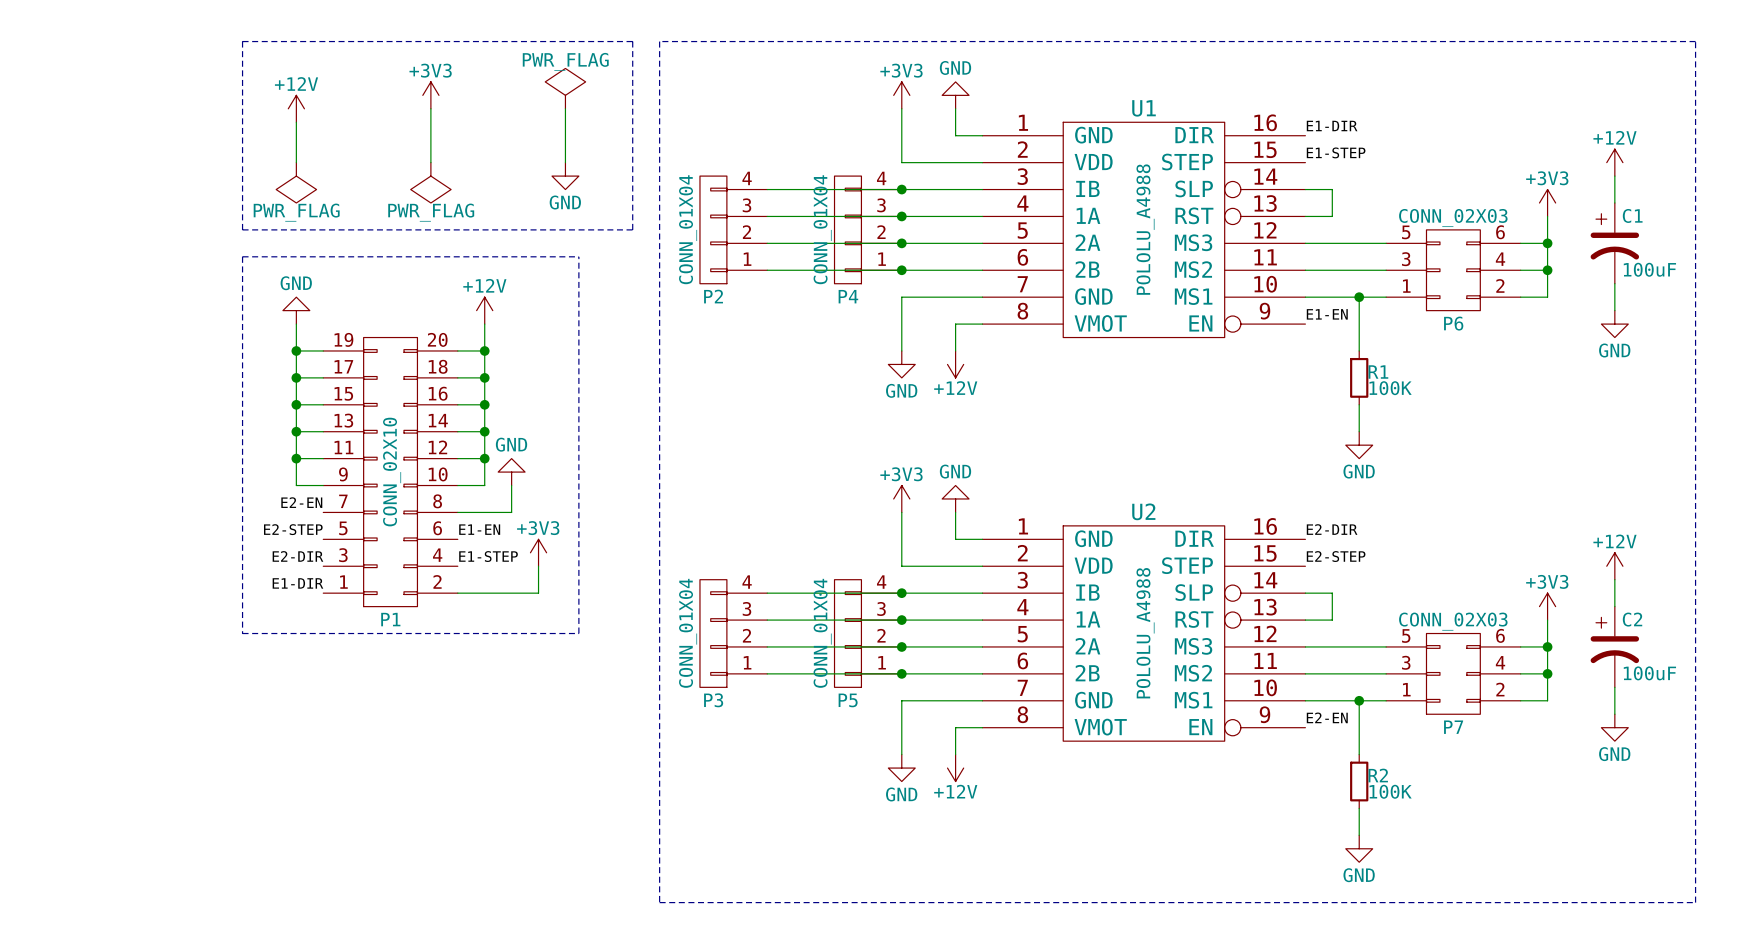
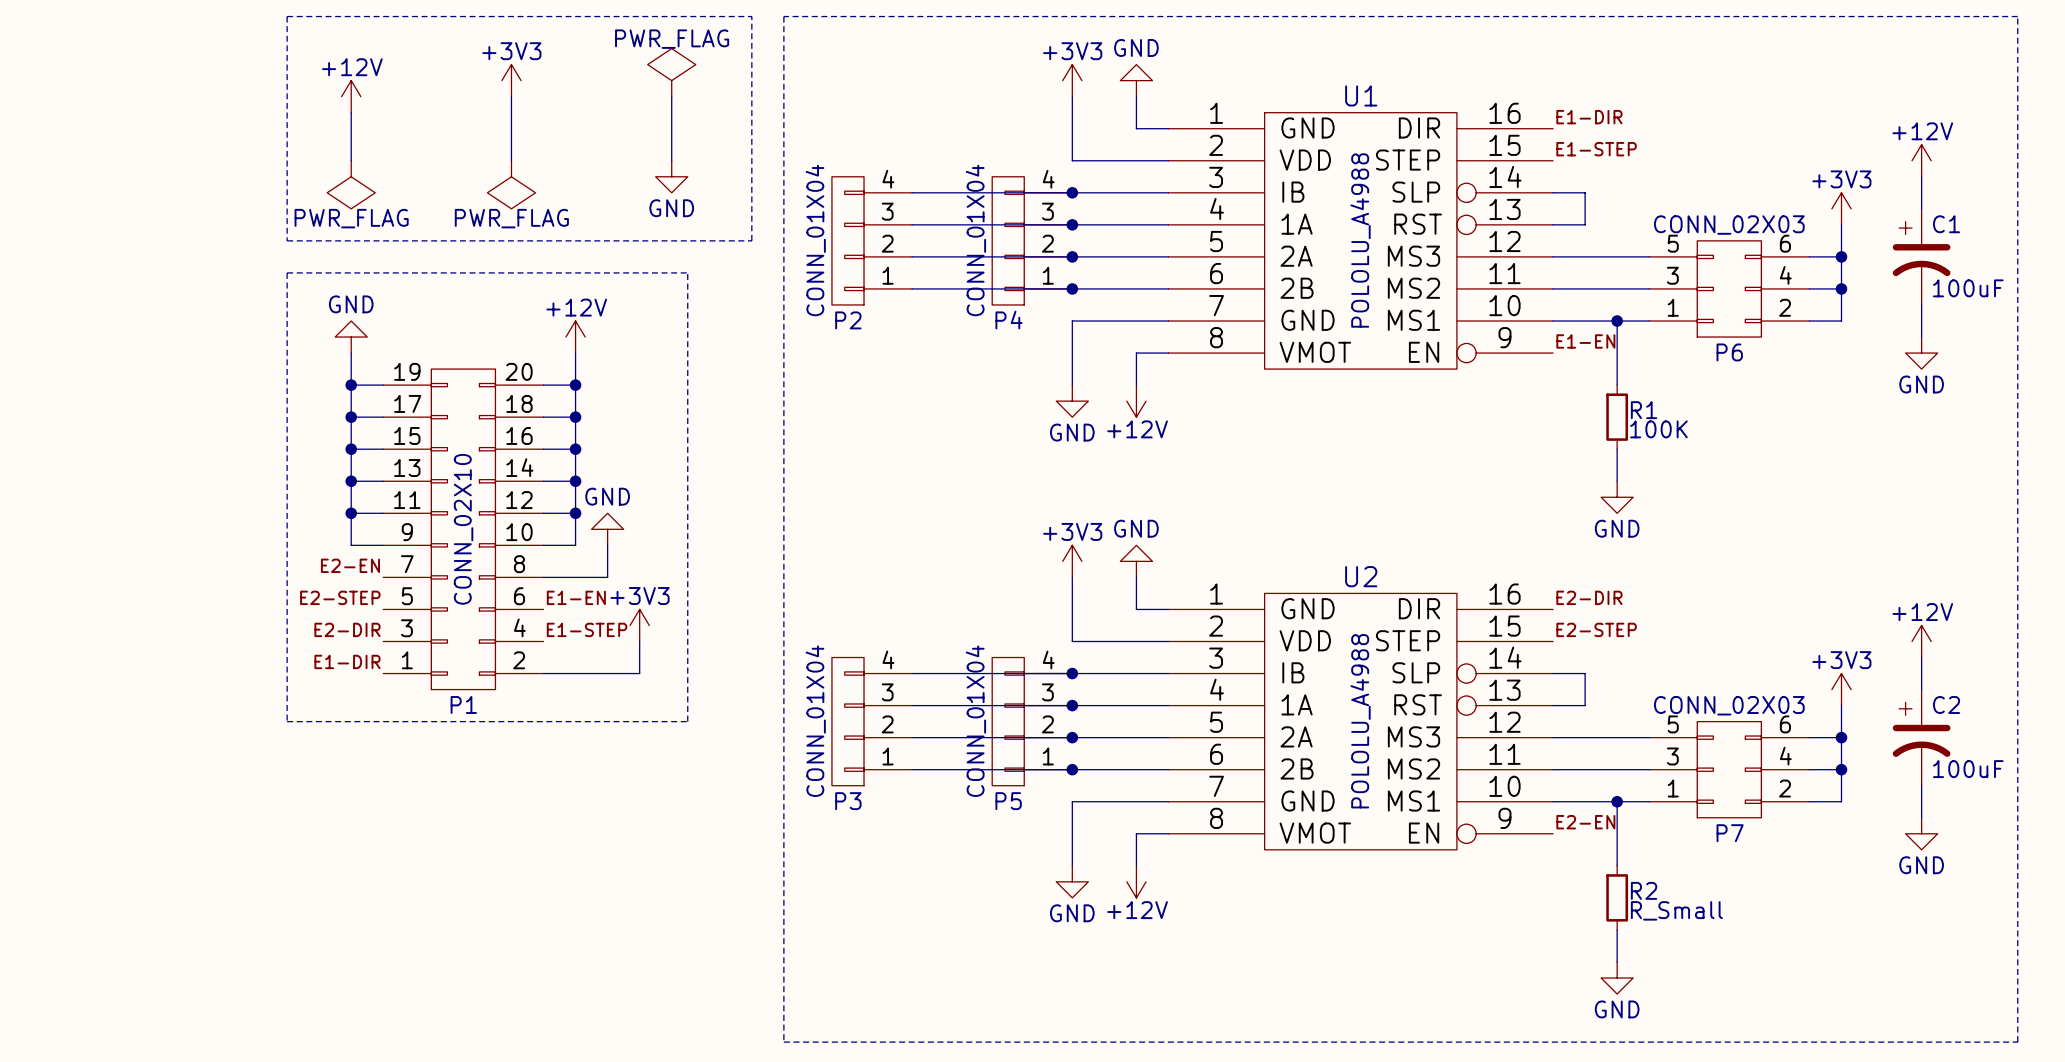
R2 value: 100K (1390, 791) -> R_Small (1676, 910)

